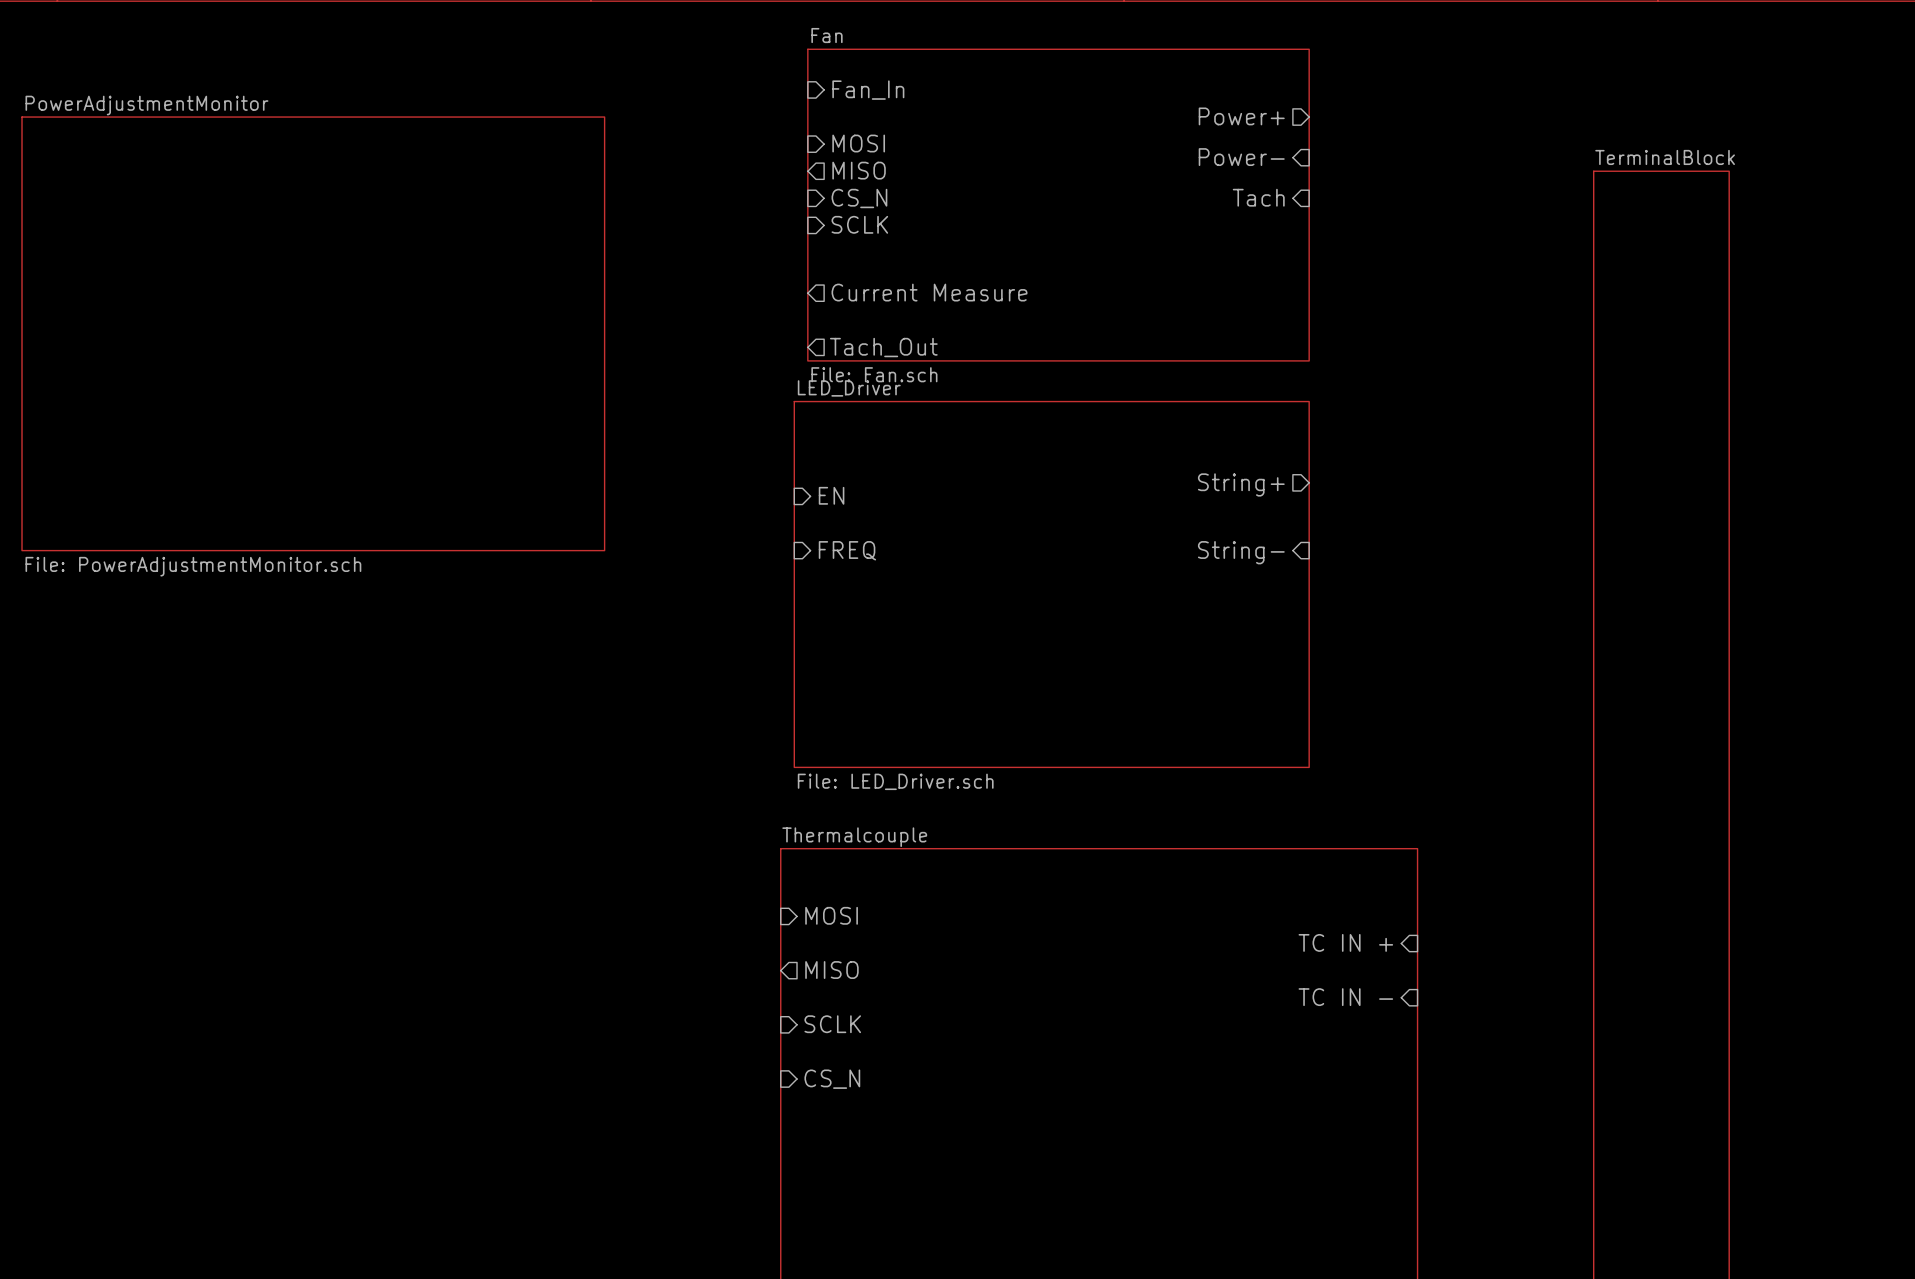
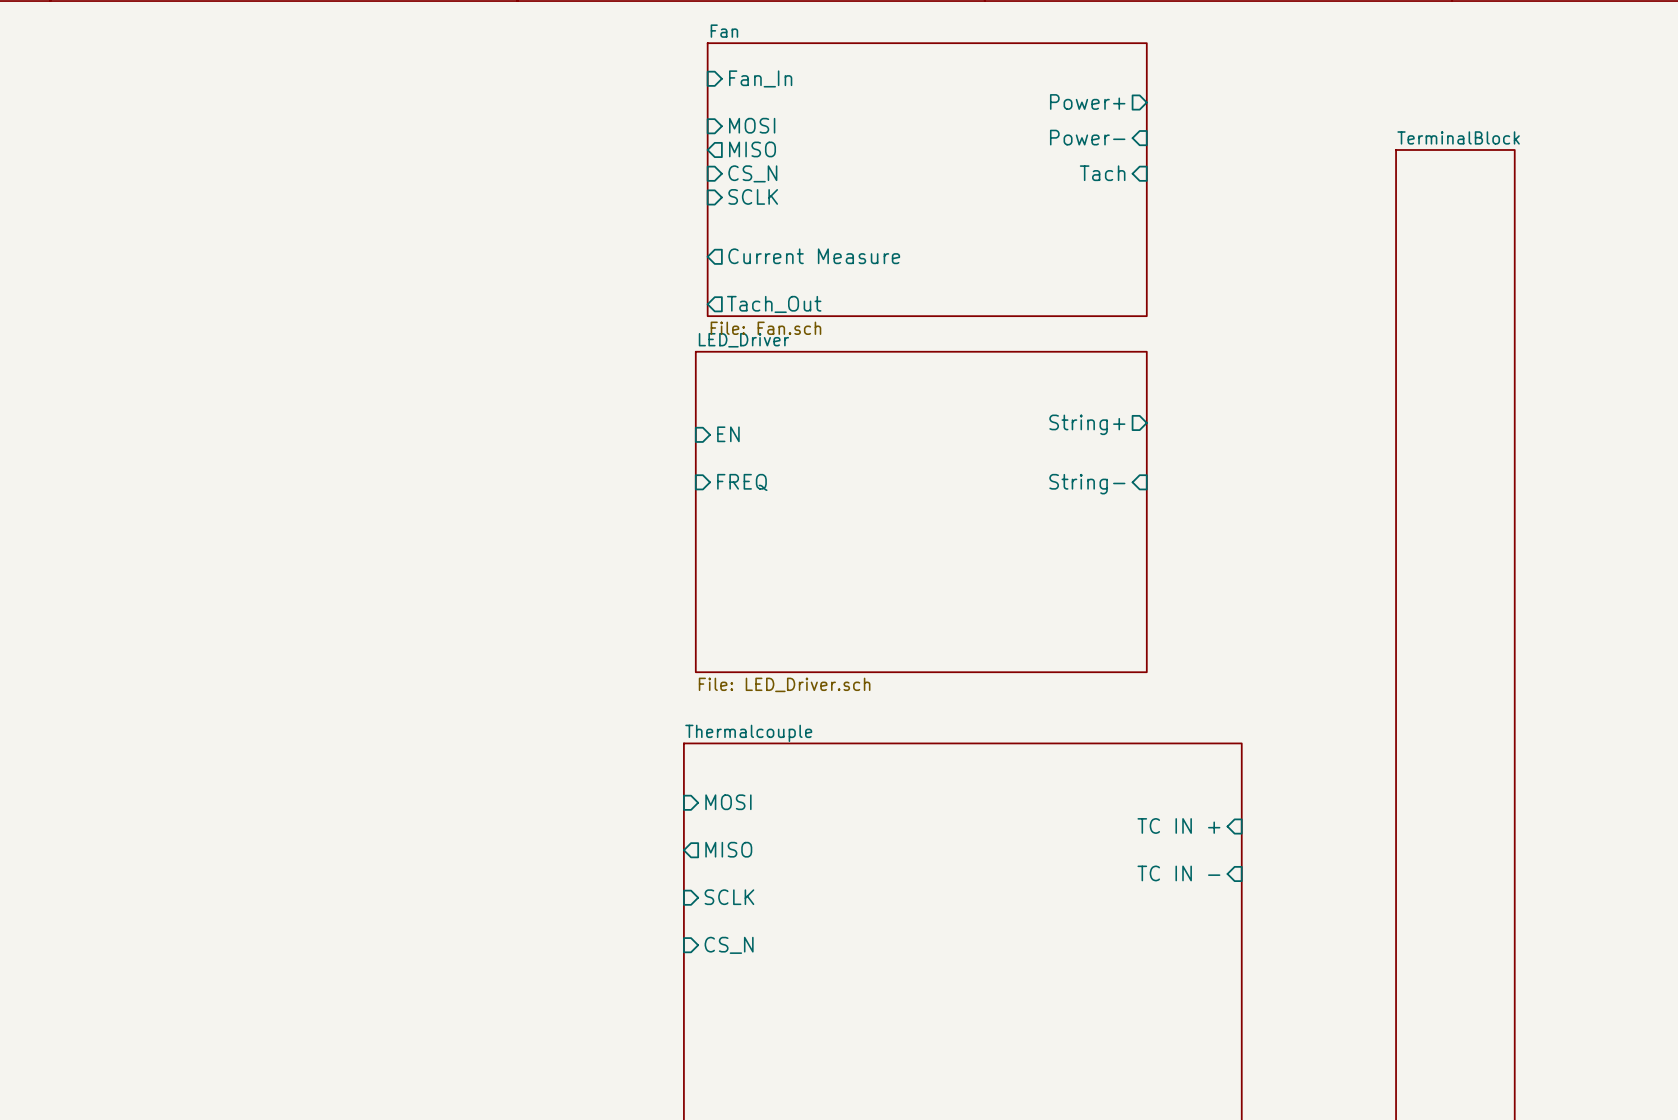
sheet PowerAdjustmentMonitor: File: PowerAdjustmentMonitor.sch (313, 333) -> none

